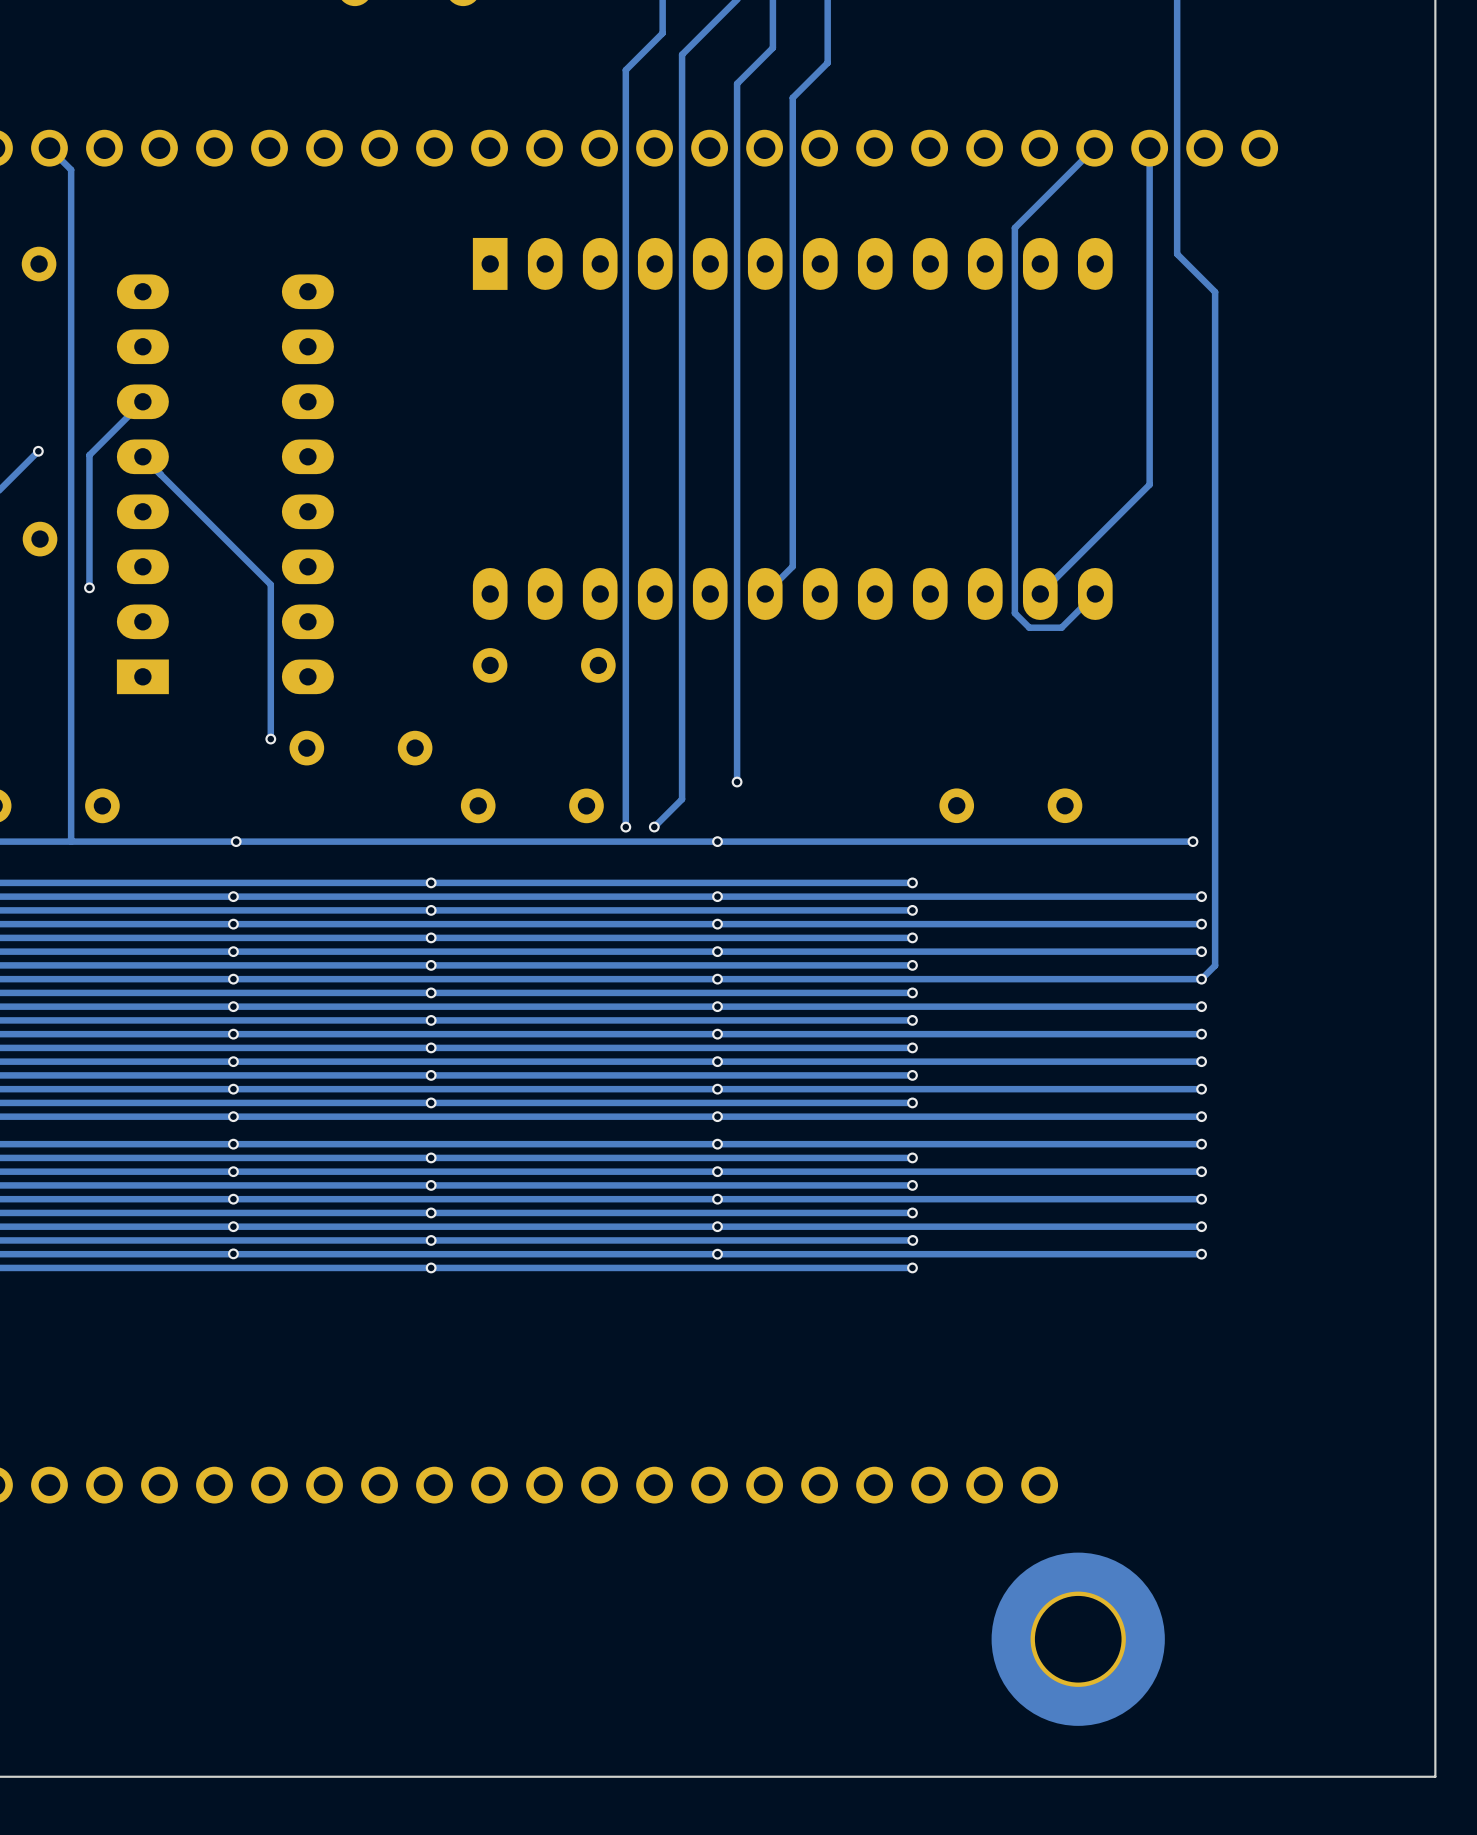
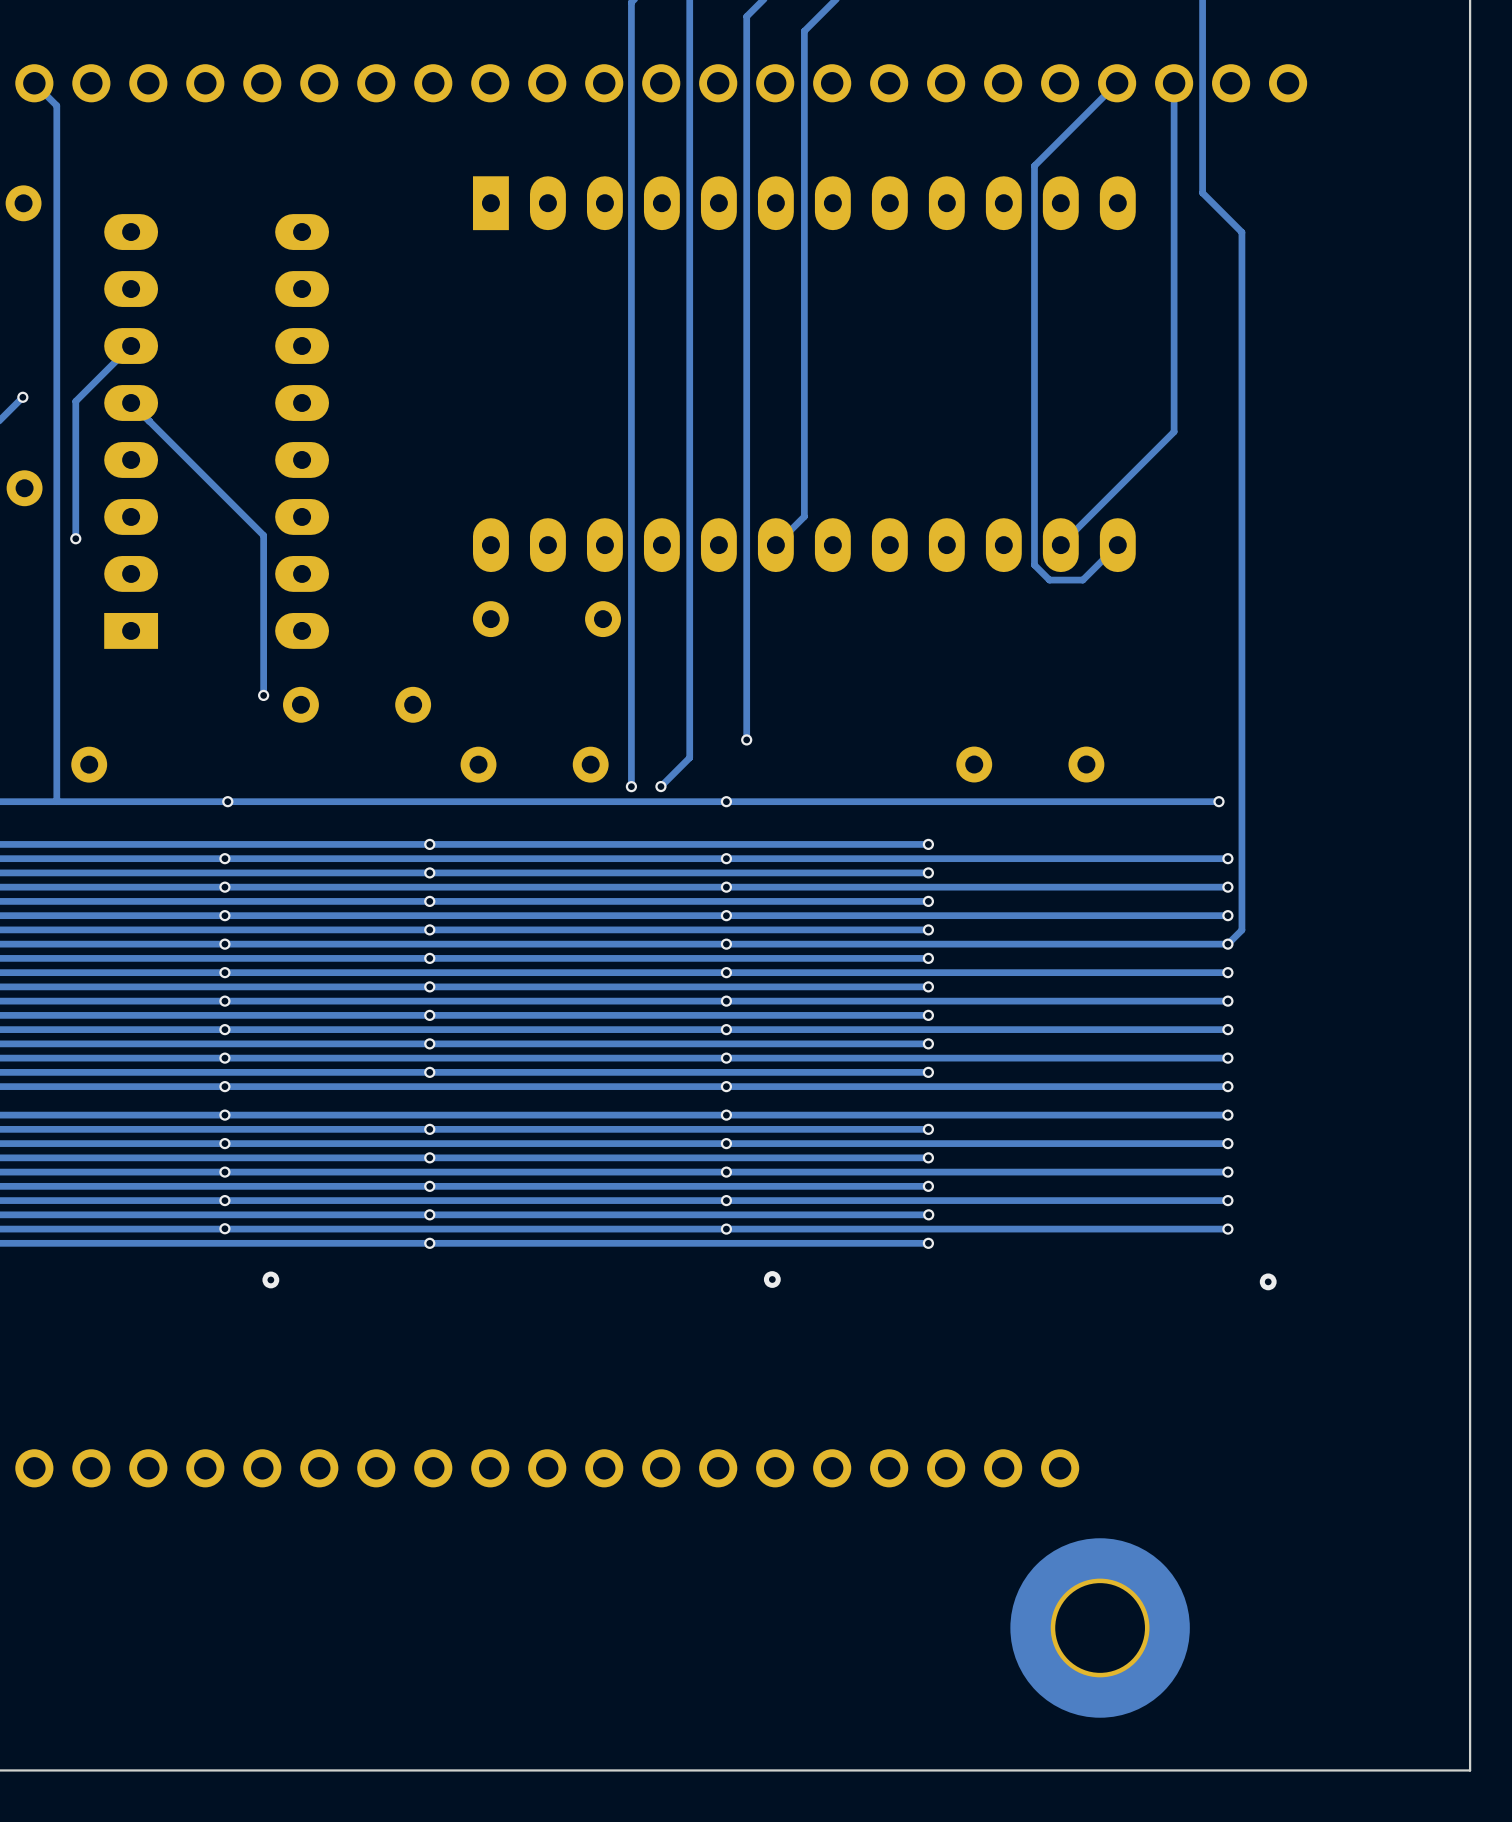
via: none -> (772, 1279)
via: none -> (270, 1279)
via: none -> (1268, 1281)

